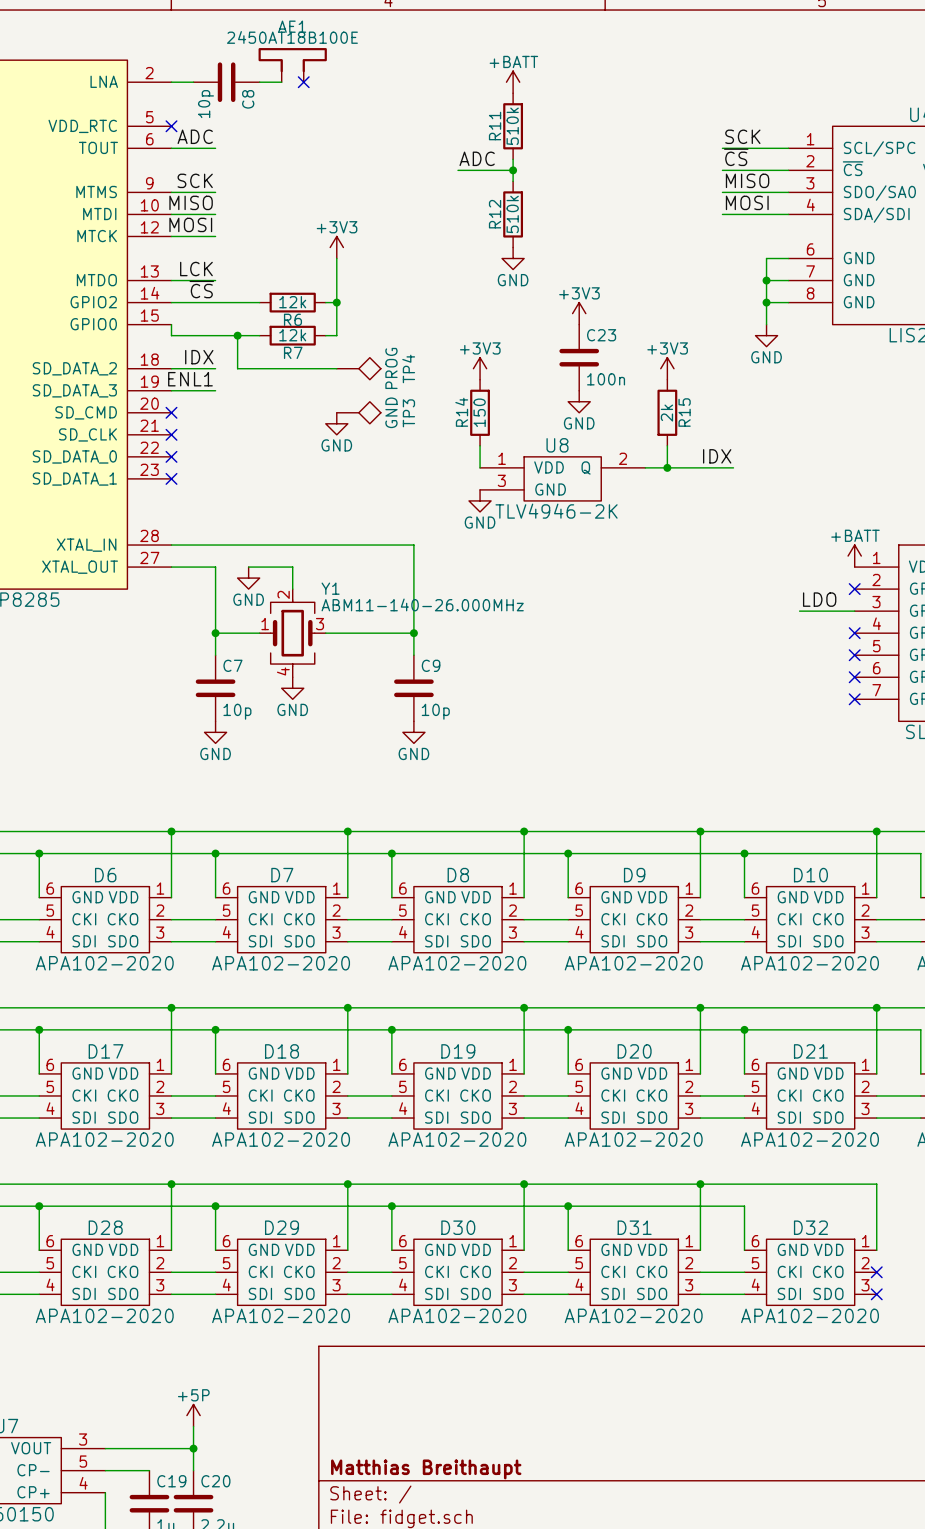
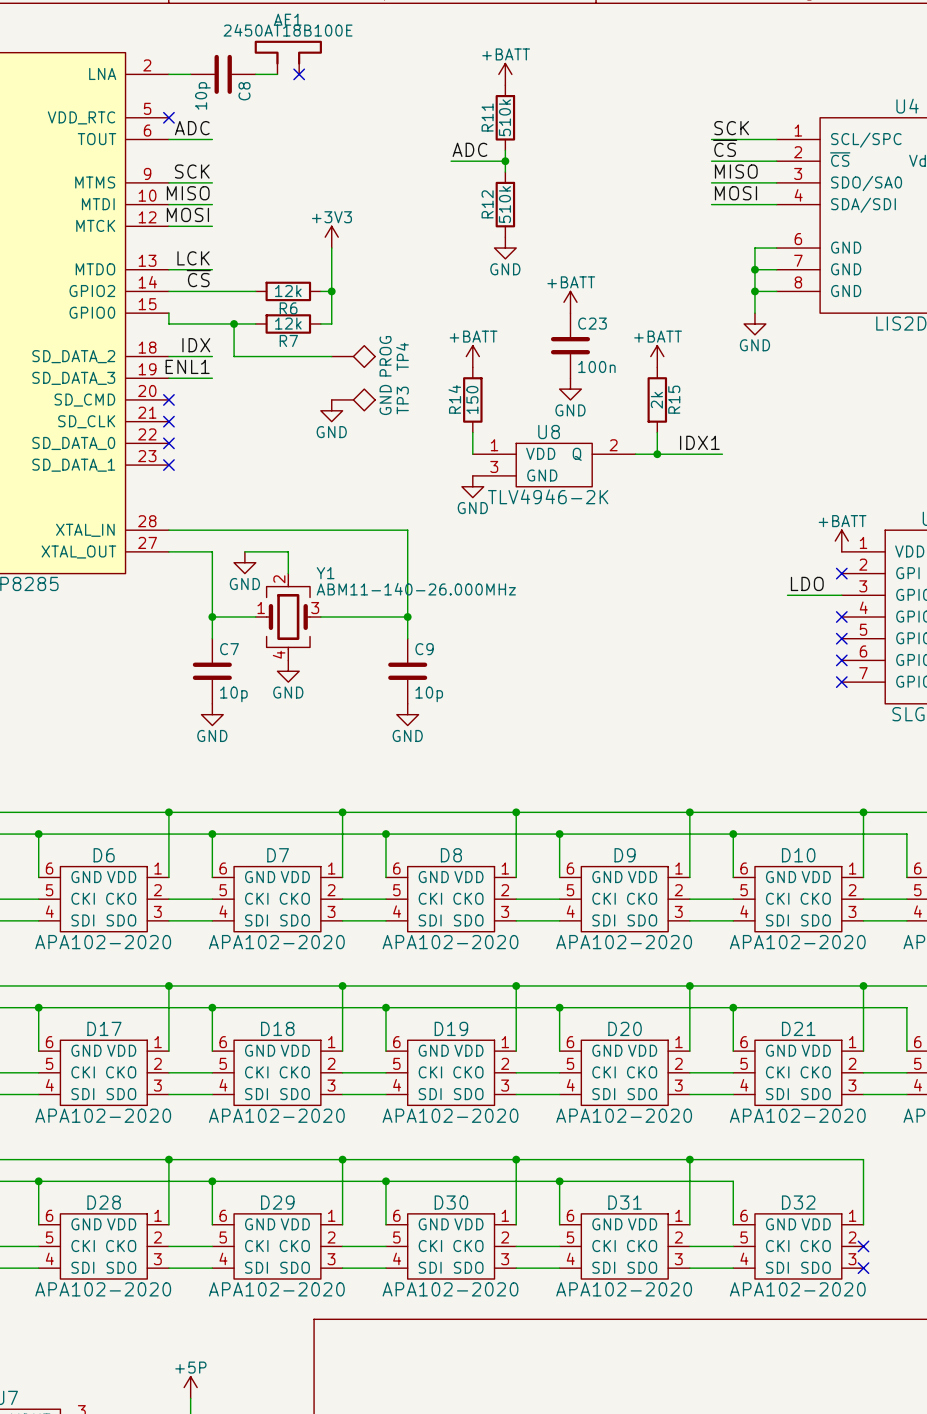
power symbol: +3V3 (579, 313) -> +BATT (570, 302)
power symbol: +3V3 (480, 368) -> +BATT (472, 356)
power symbol: +3V3 (667, 368) -> +BATT (657, 356)
label: IDX (717, 456) -> IDX1 (699, 442)

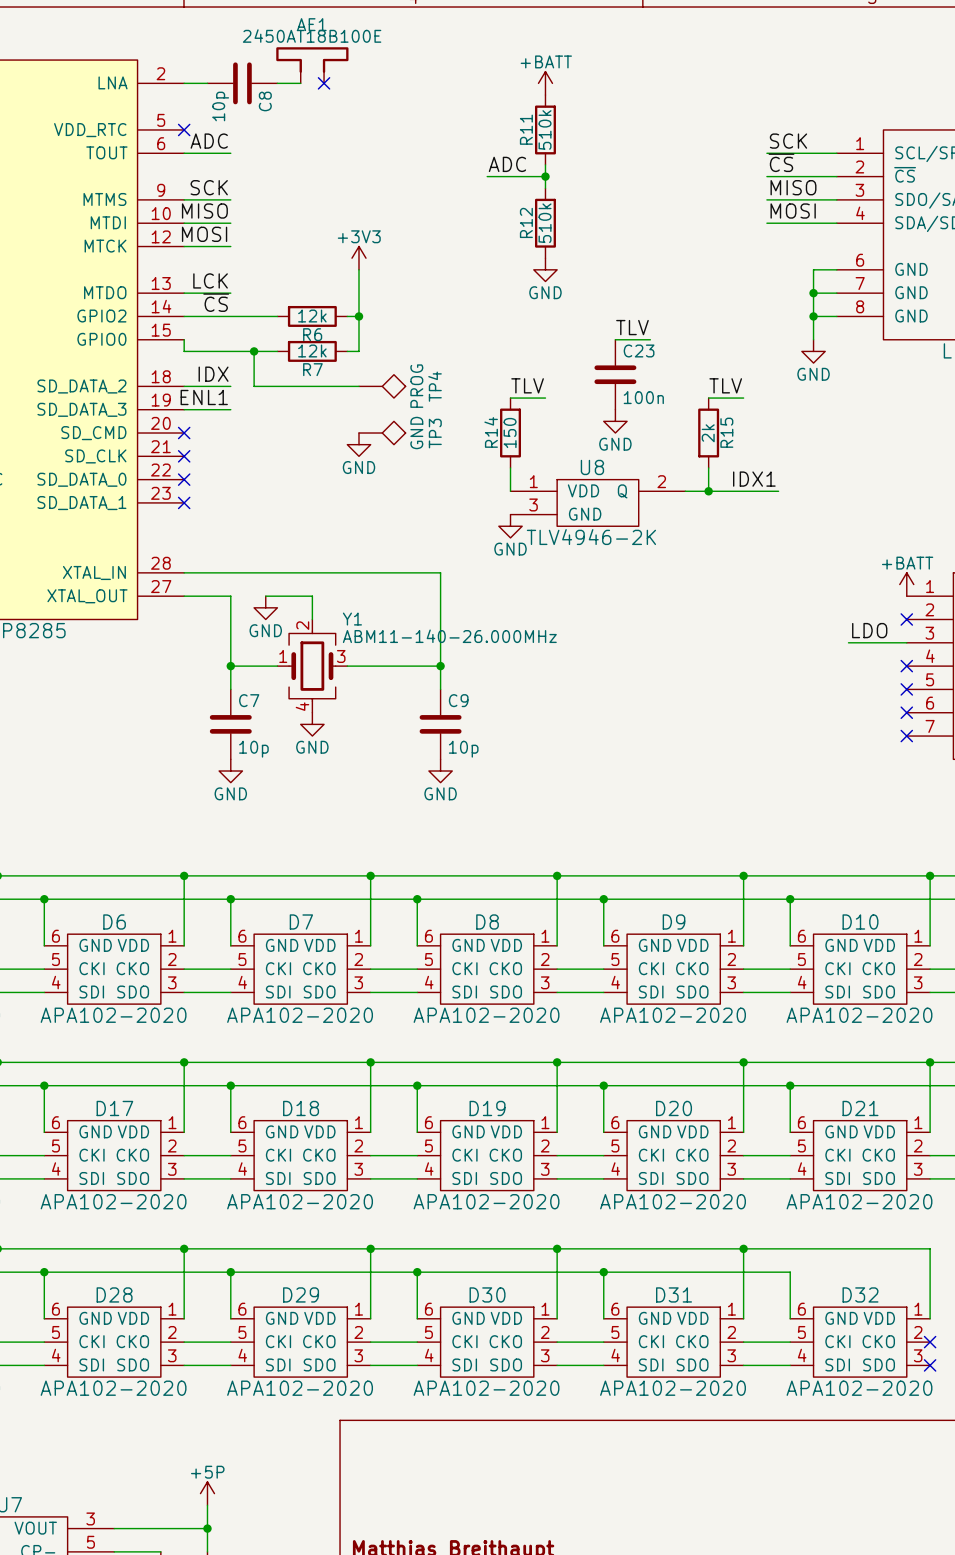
label: none -> TLV (632, 327)
power symbol: +BATT (570, 302) -> none
wire: none -> (615, 339) (650, 339)
power symbol: +BATT (472, 356) -> none
label: none -> TLV (527, 385)
power symbol: +BATT (657, 356) -> none
label: none -> TLV (725, 385)
wire: none -> (510, 398) (545, 398)
wire: none -> (708, 398) (743, 398)

